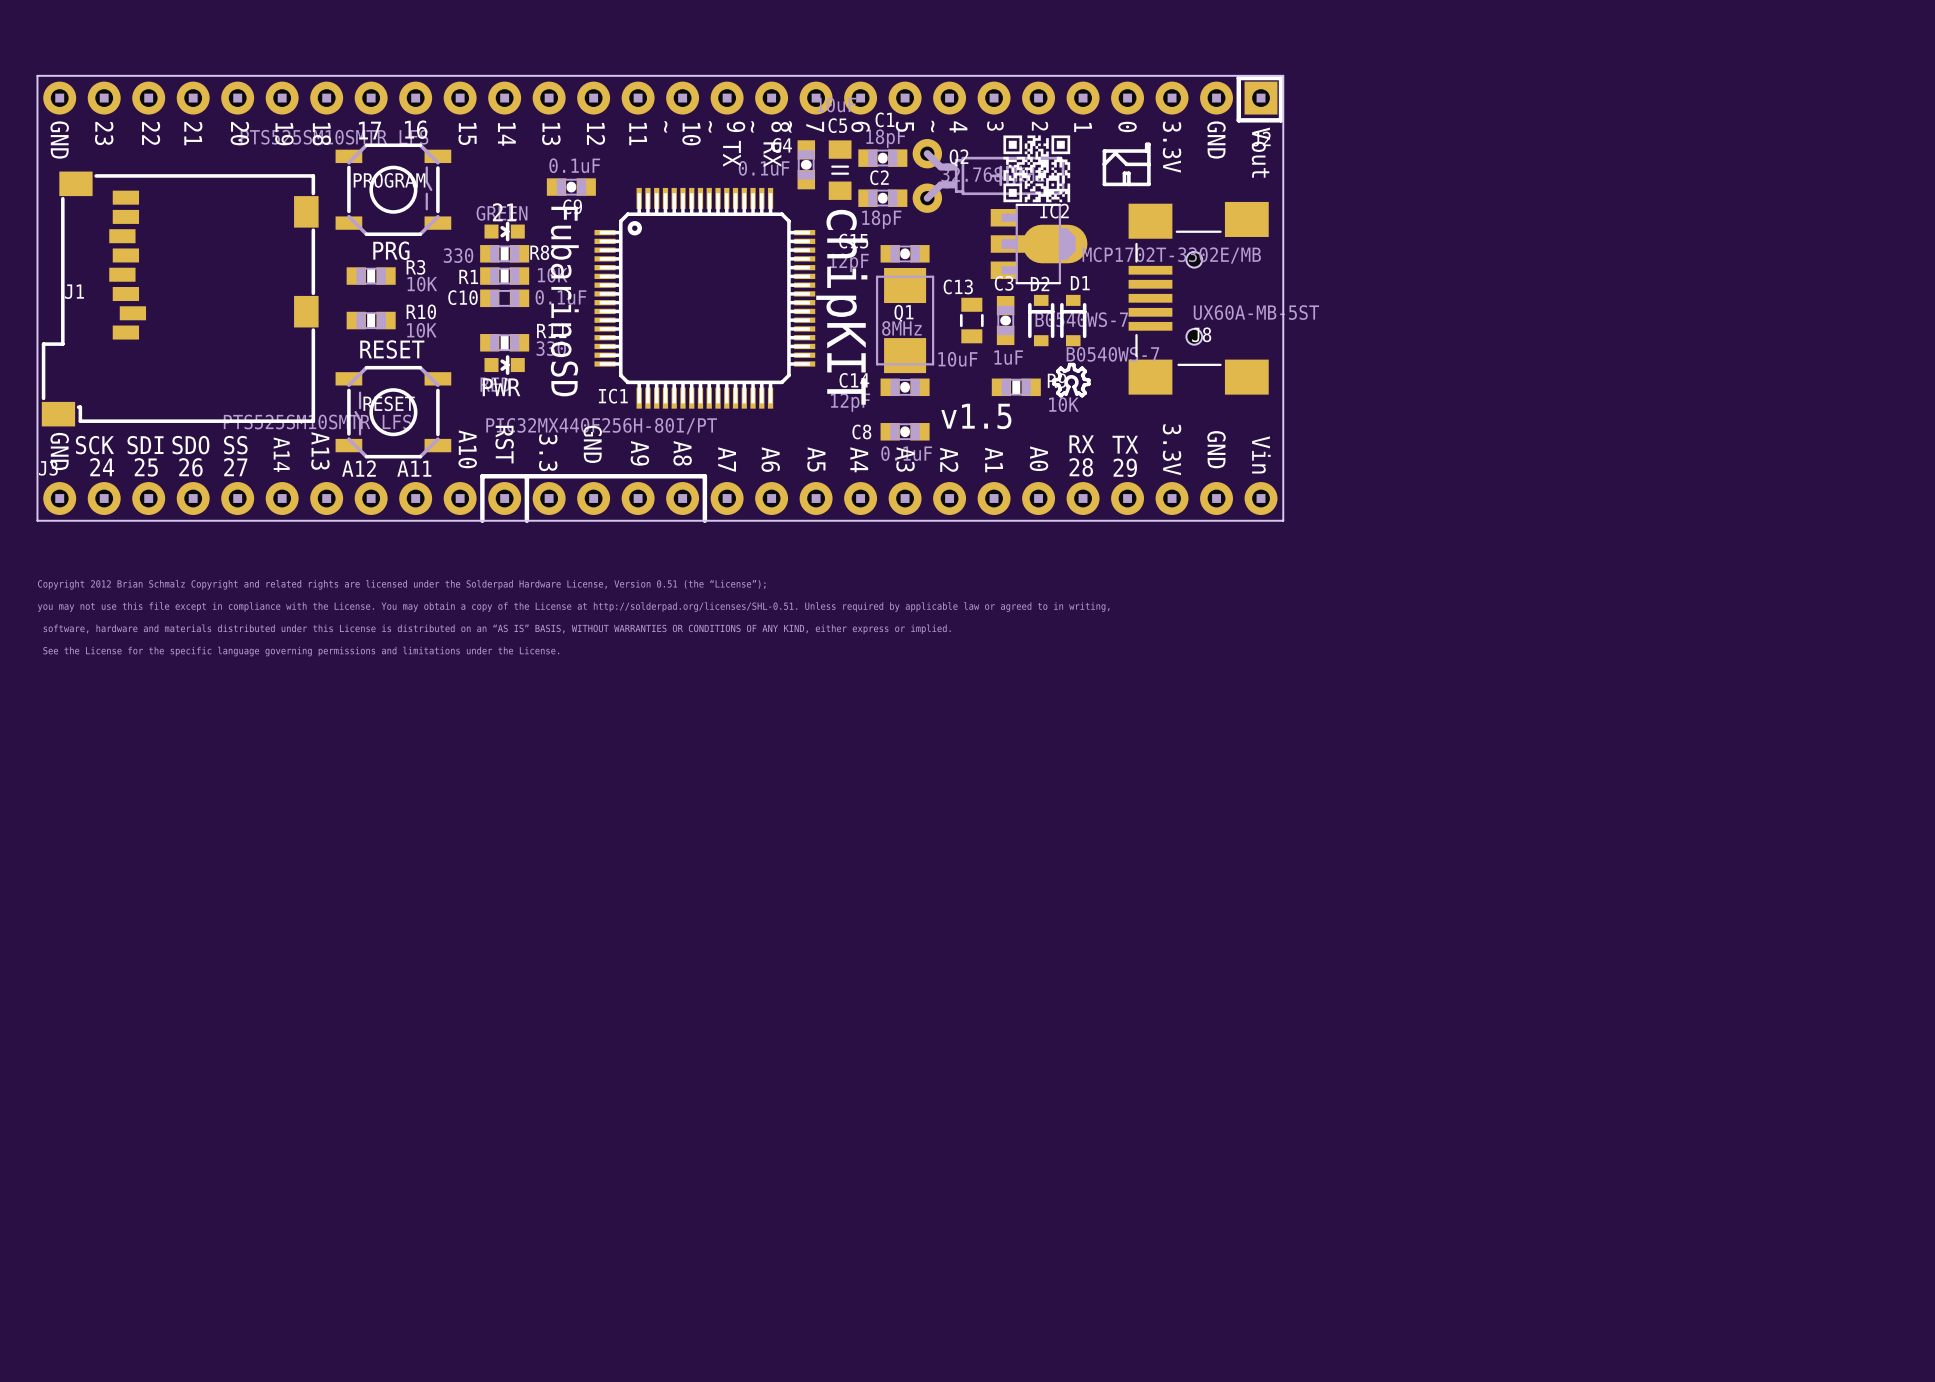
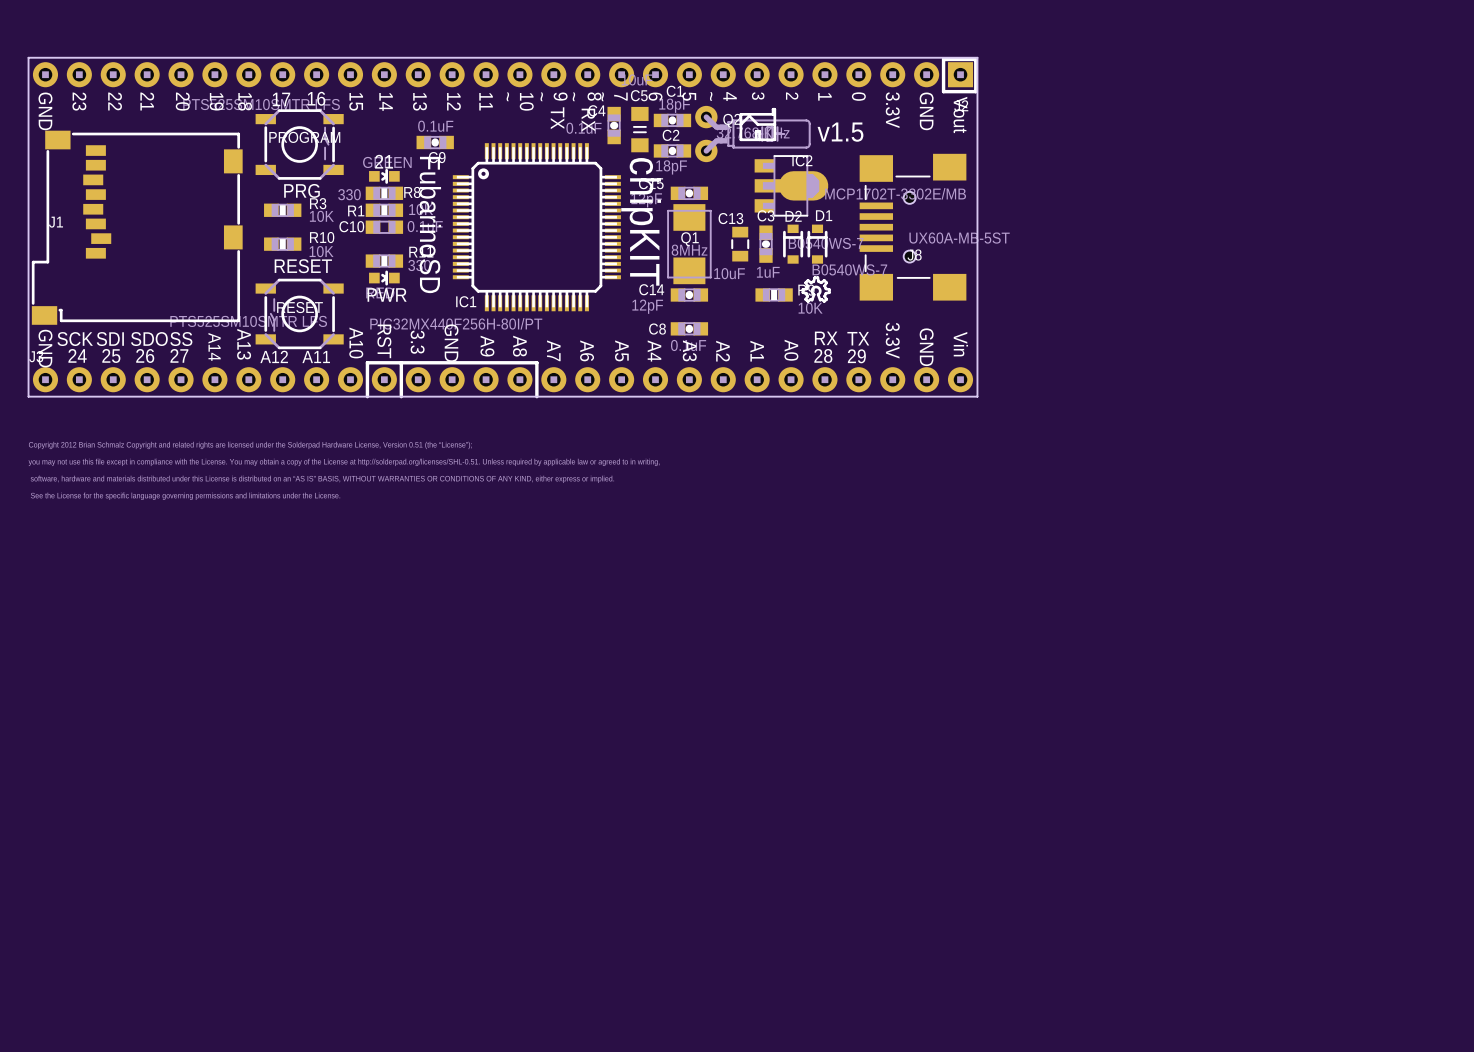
drawing: [1003, 135, 1071, 203] -> none
drawing position: (1126, 164) -> (757, 124)
text position: v1.5 (976, 416) -> v1.5 (840, 132)

